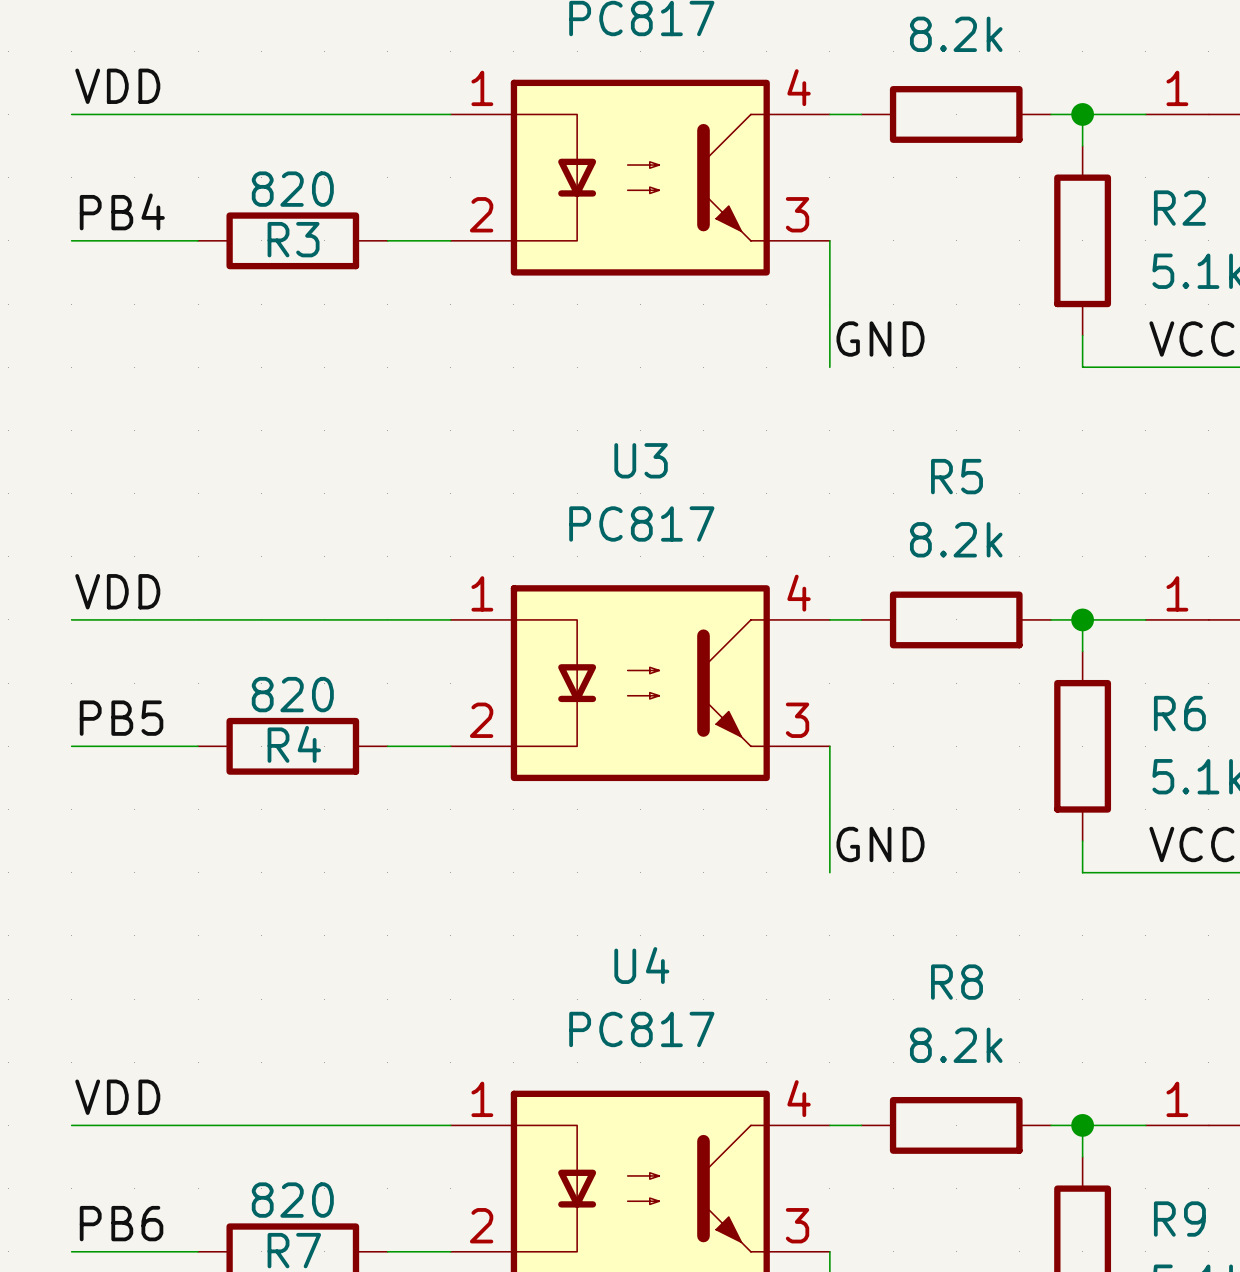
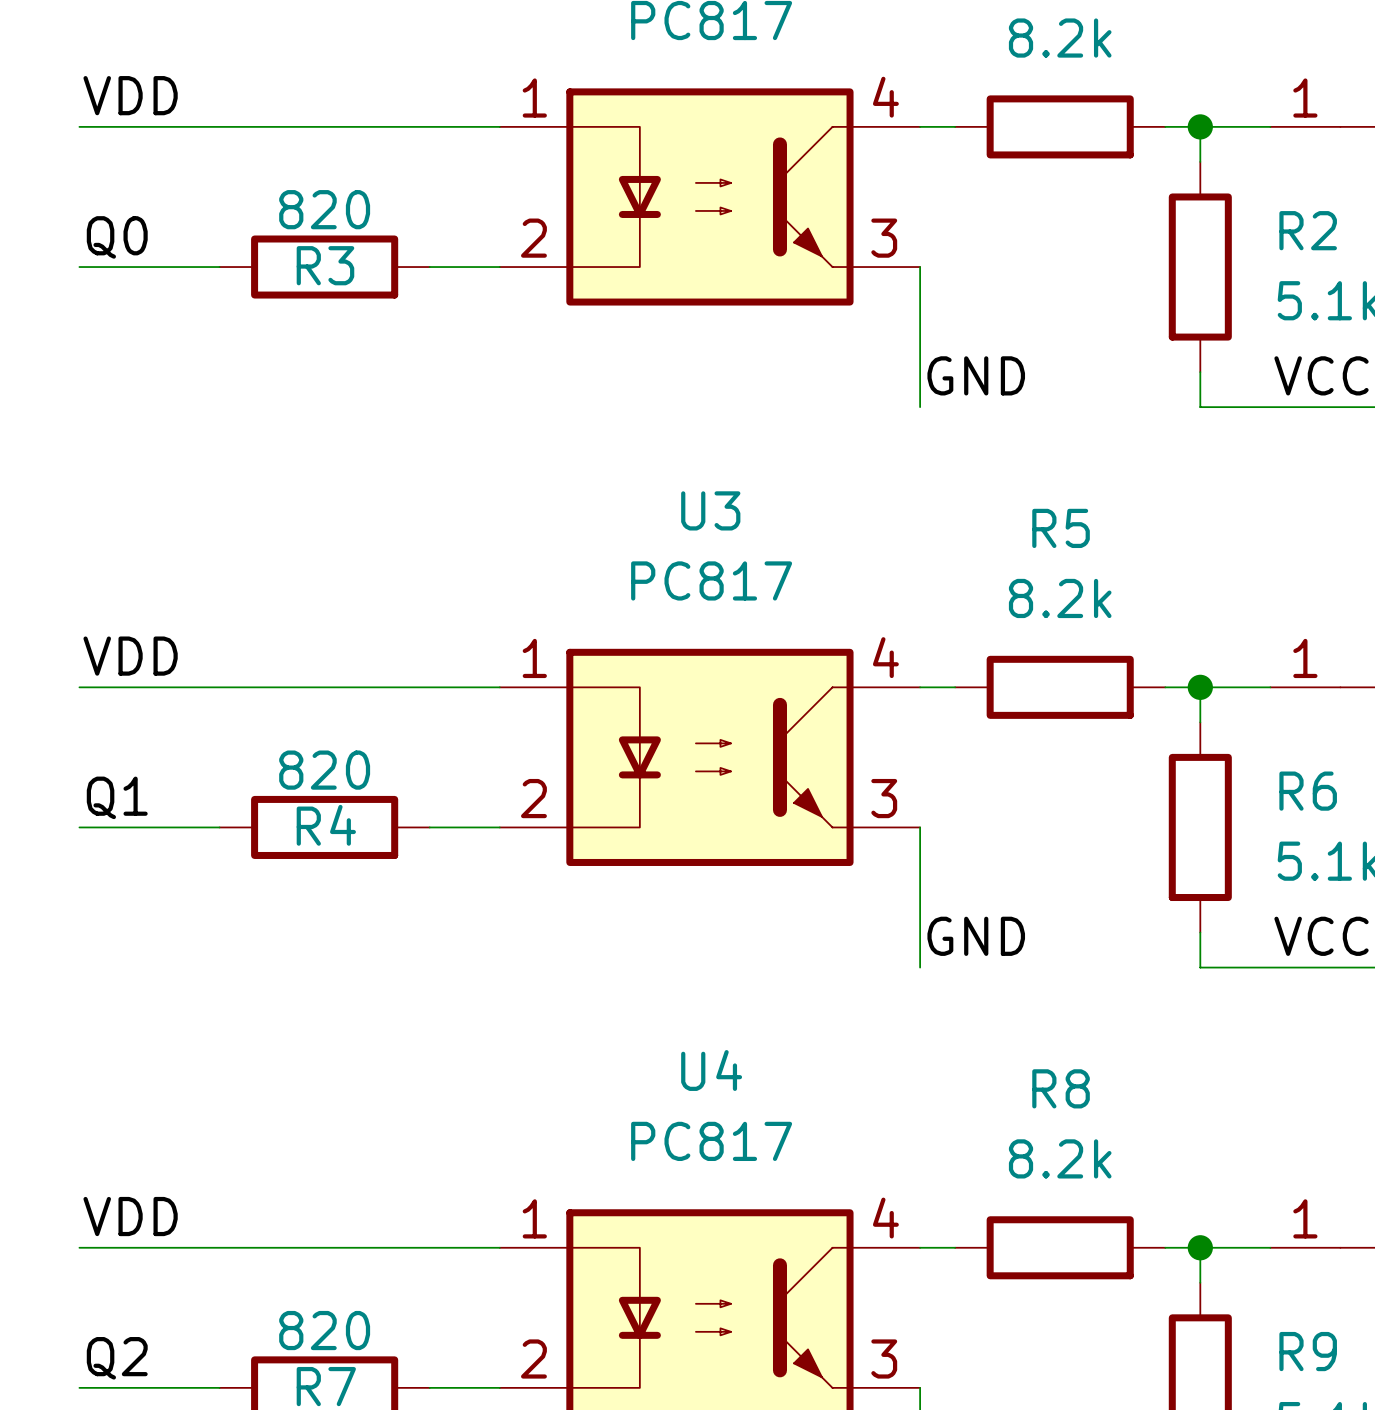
label: PB4 (122, 211) -> Q0 (117, 237)
label: PB5 (121, 718) -> Q1 (117, 797)
label: PB6 (121, 1223) -> Q2 (117, 1358)

